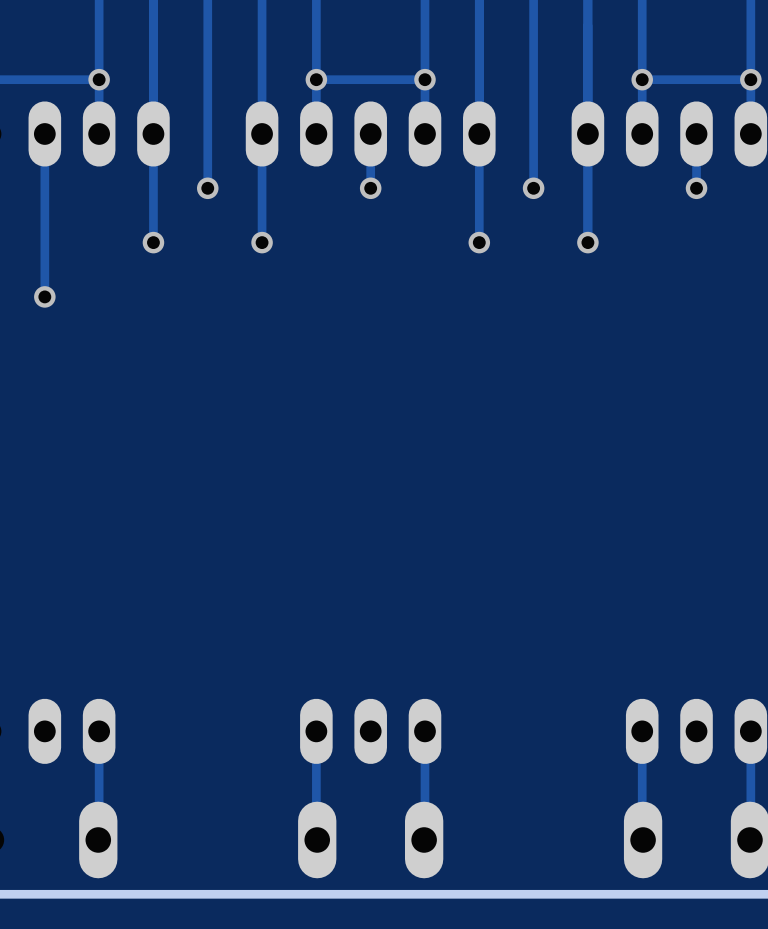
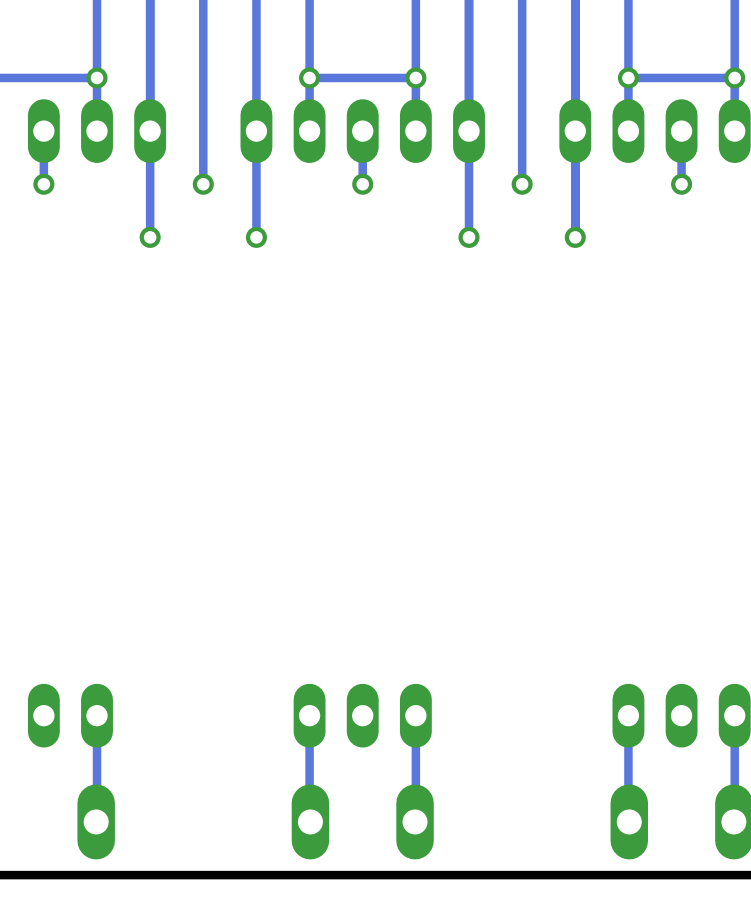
track: (44, 188) (44, 296) -> none
via position: (44, 296) -> (43, 184)

